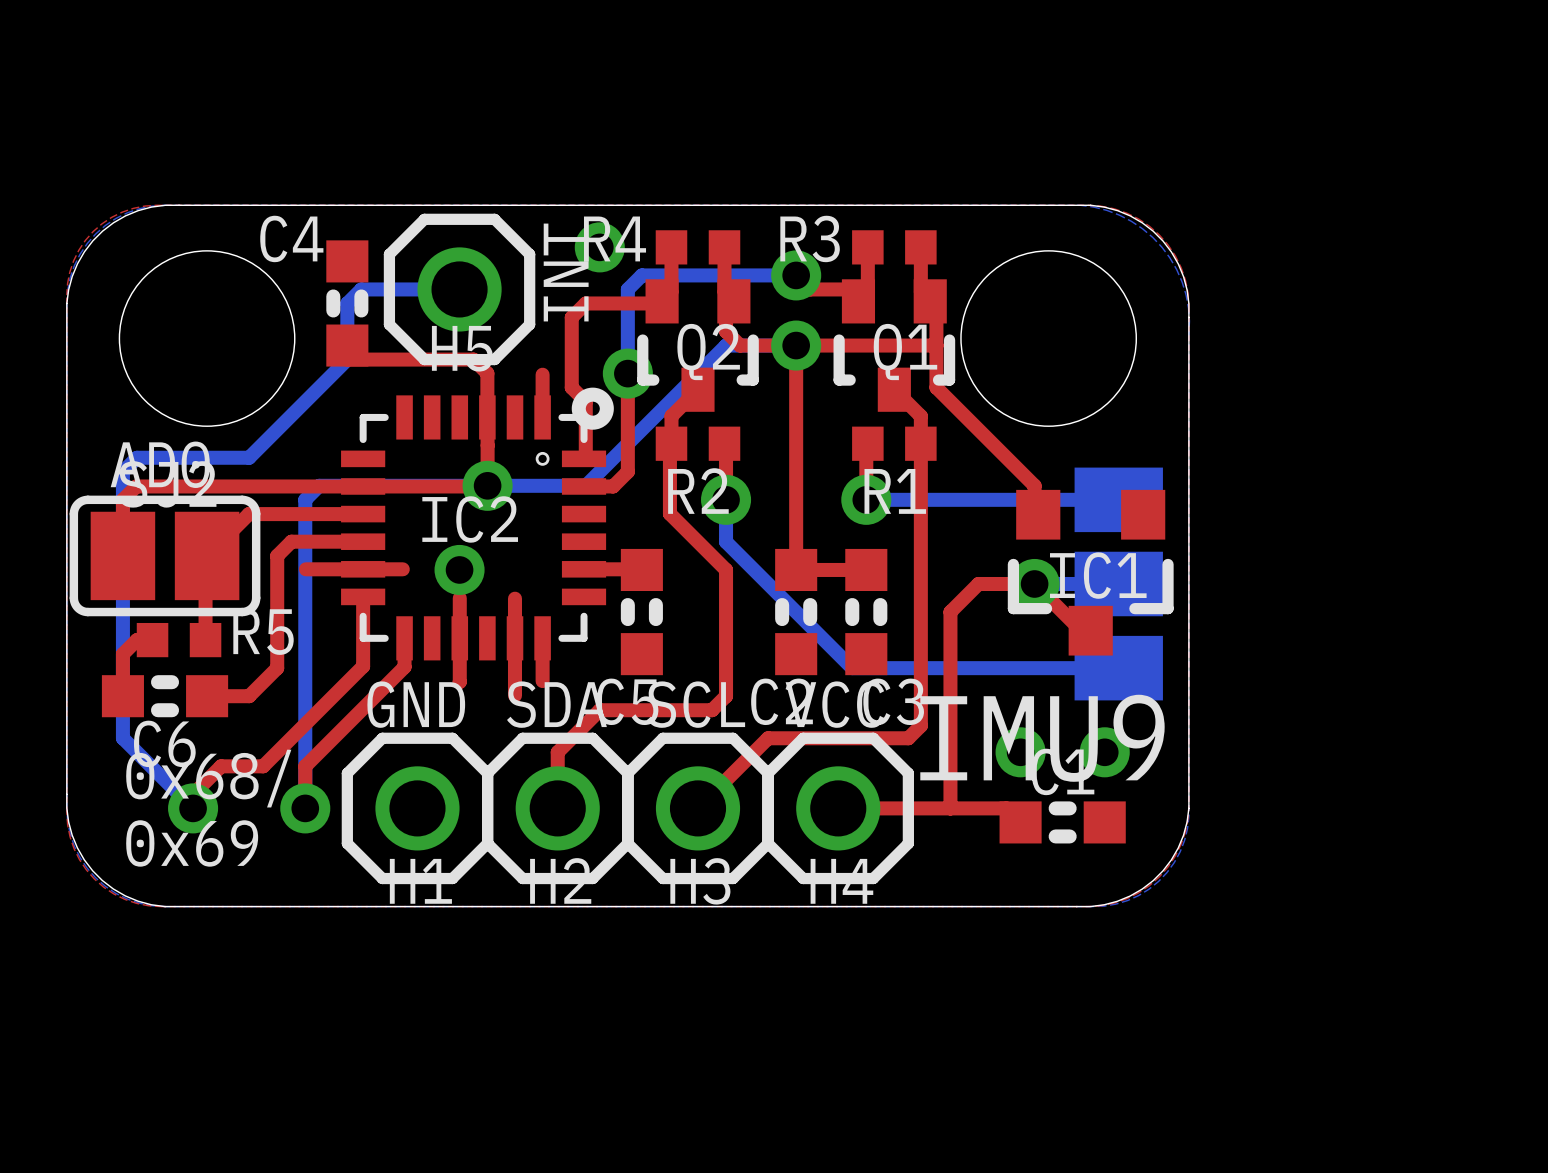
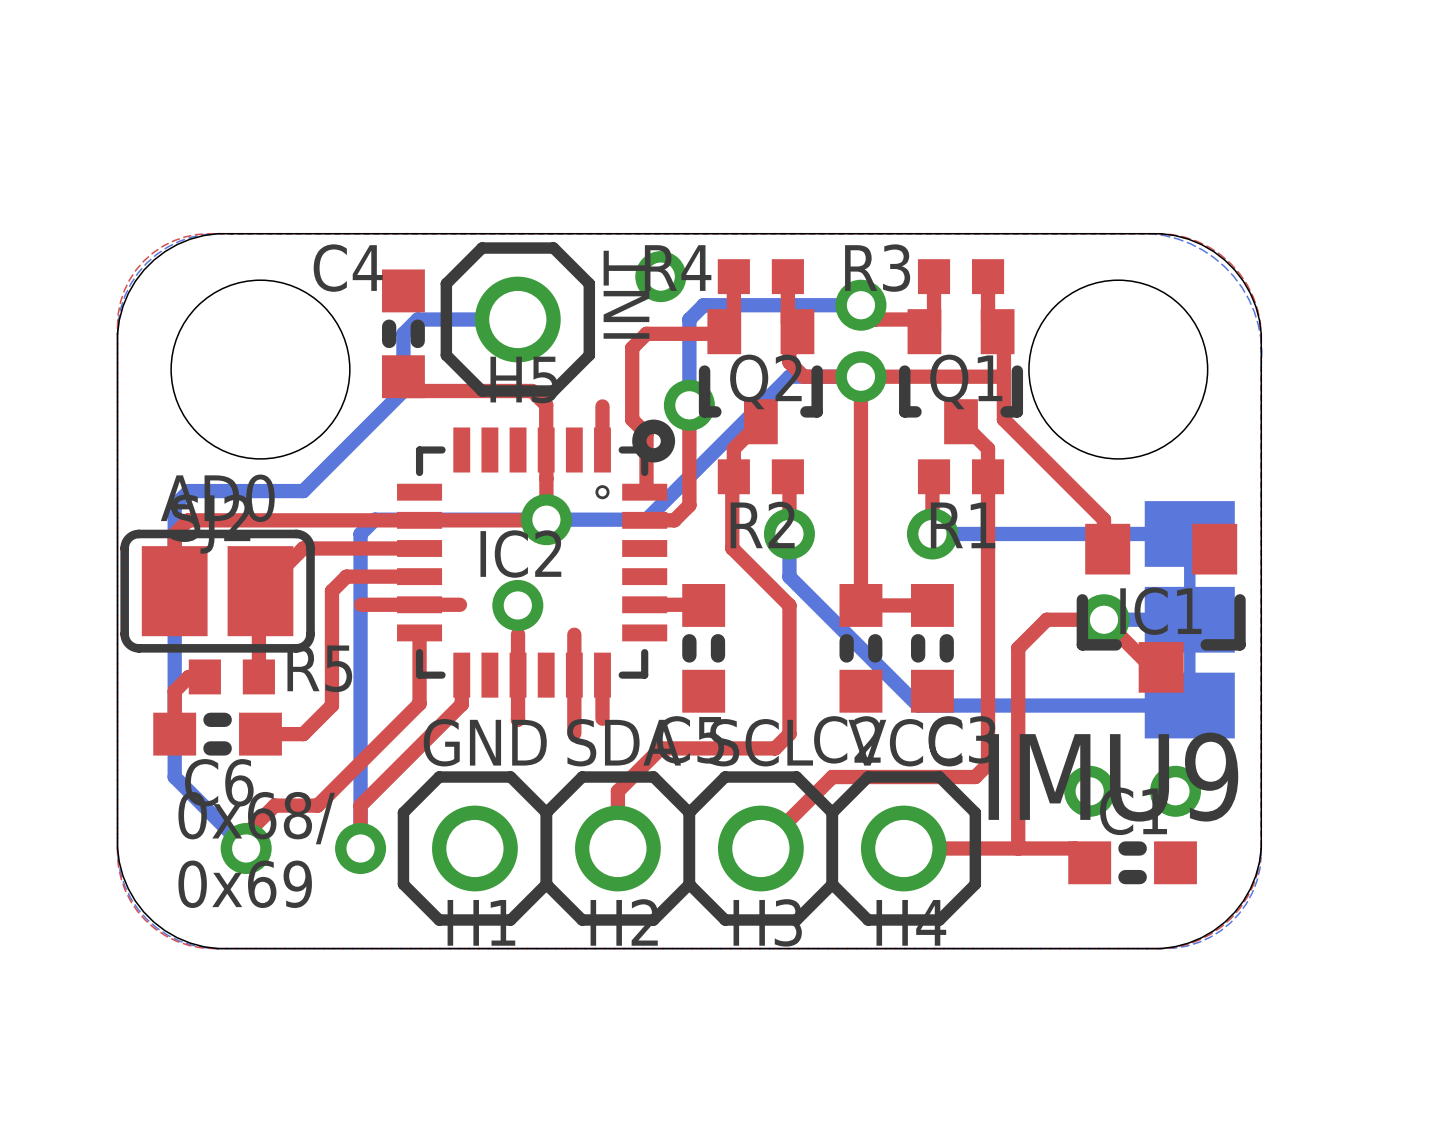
bottom track: none -> (1189, 562) (1189, 591)
bottom track: none -> (1189, 648) (1189, 676)

